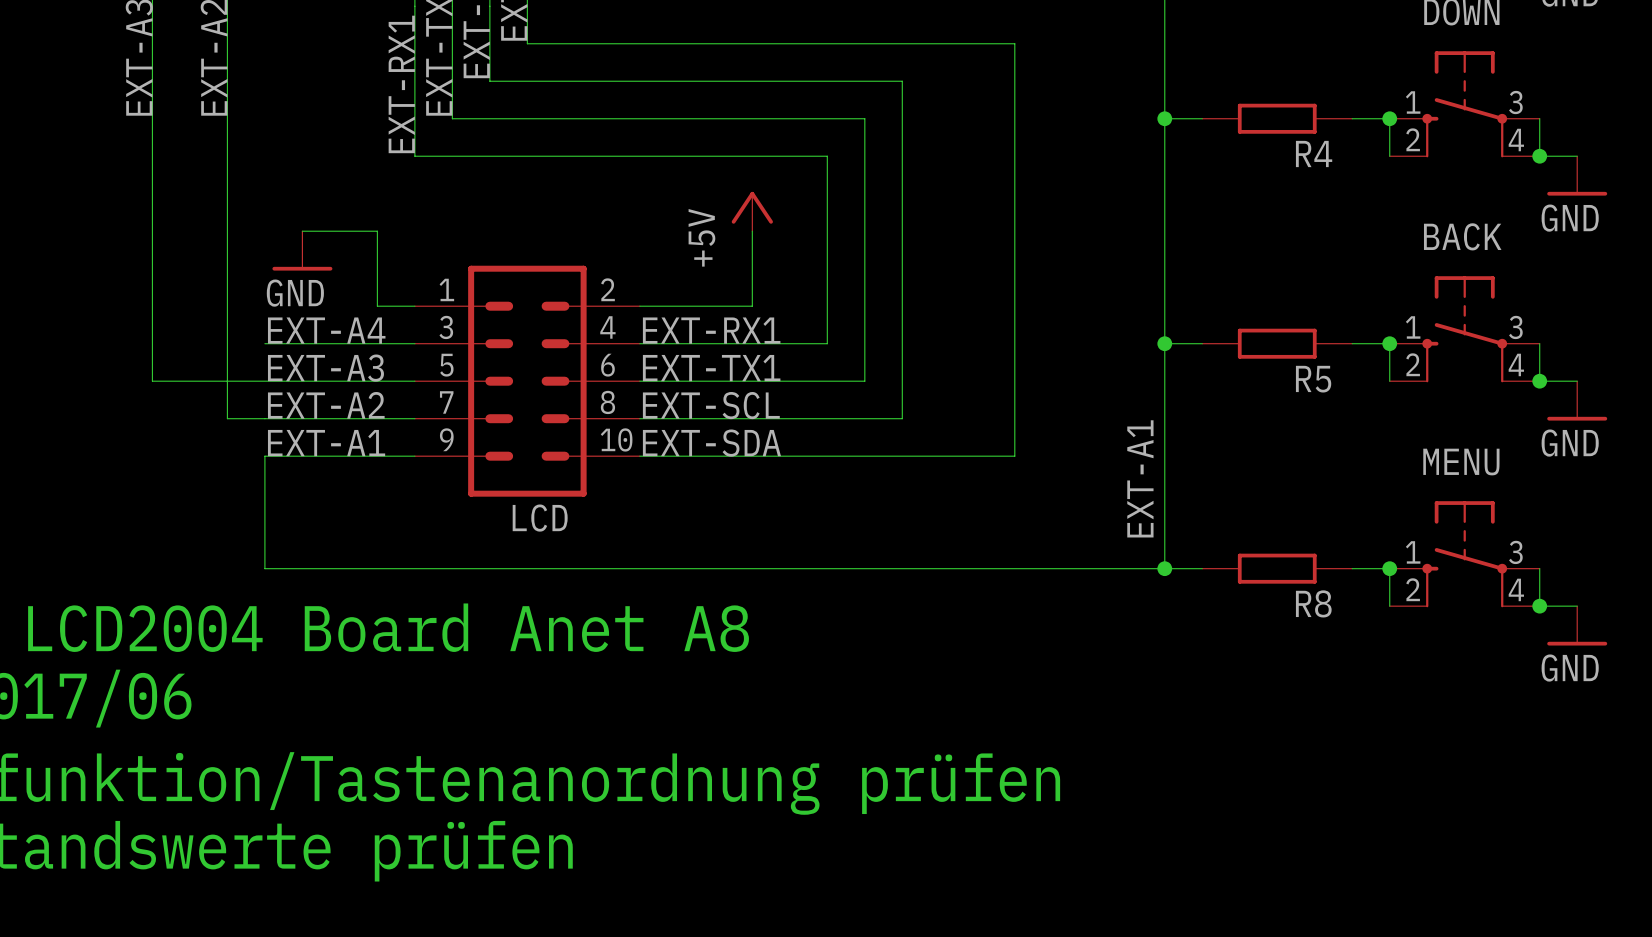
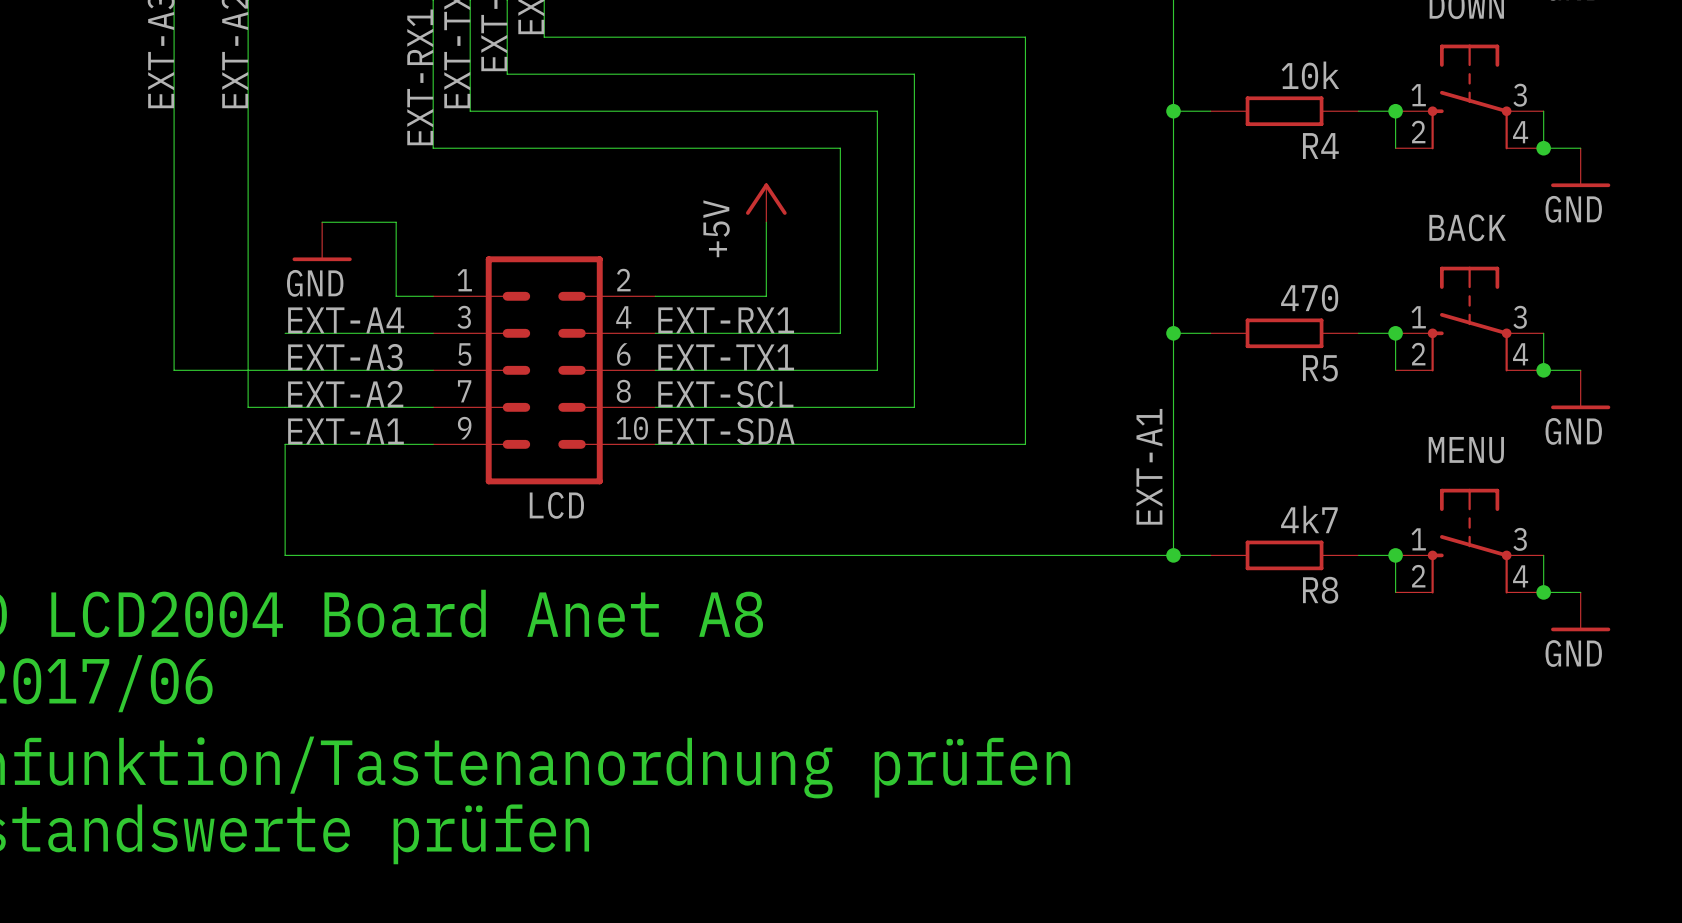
R4 value: none -> 10k (1310, 75)
R5 value: none -> 470 (1309, 298)
R8 value: none -> 4k7 (1309, 519)

